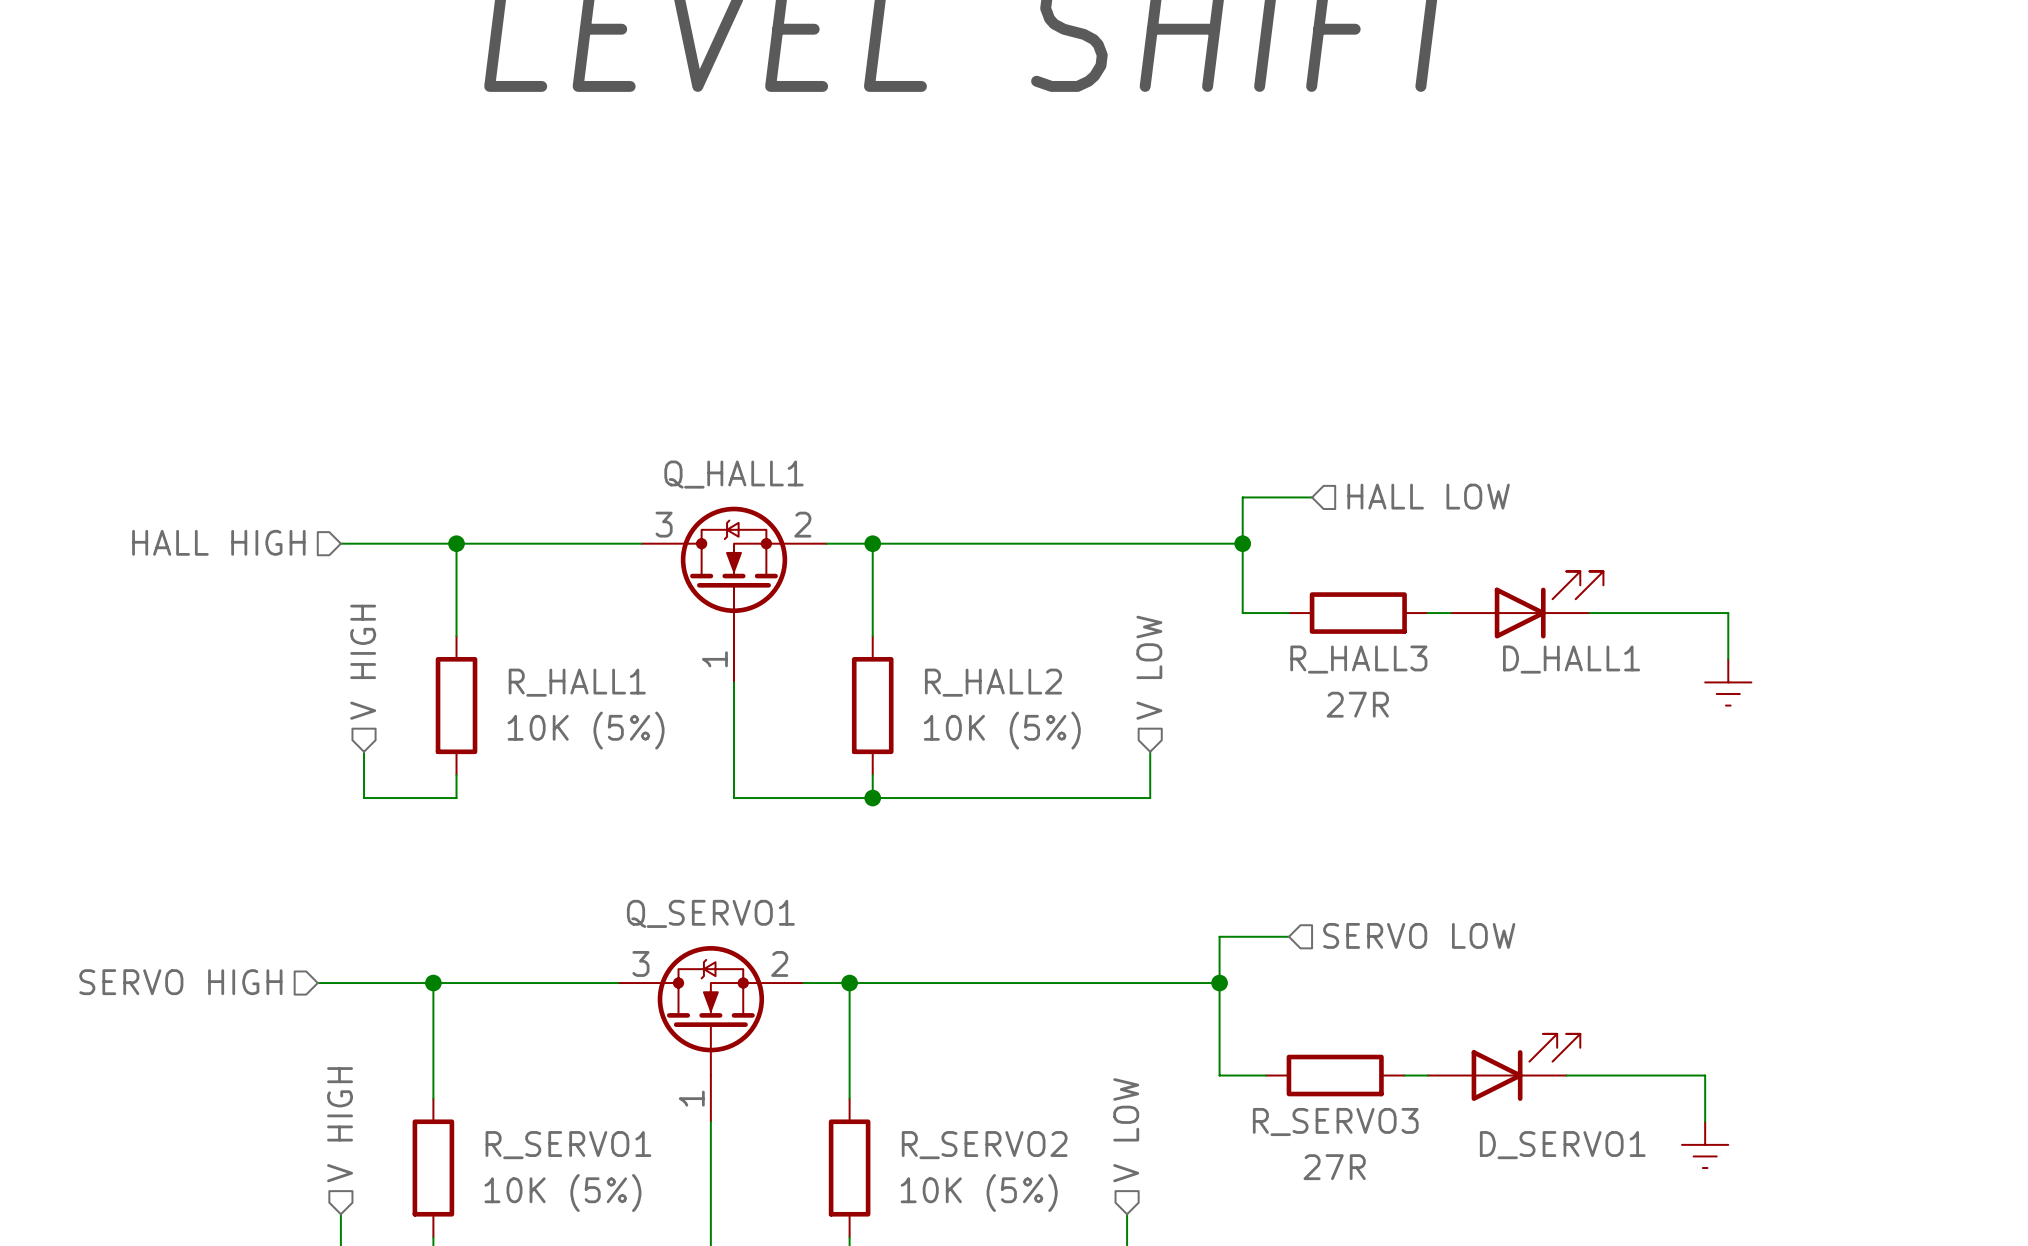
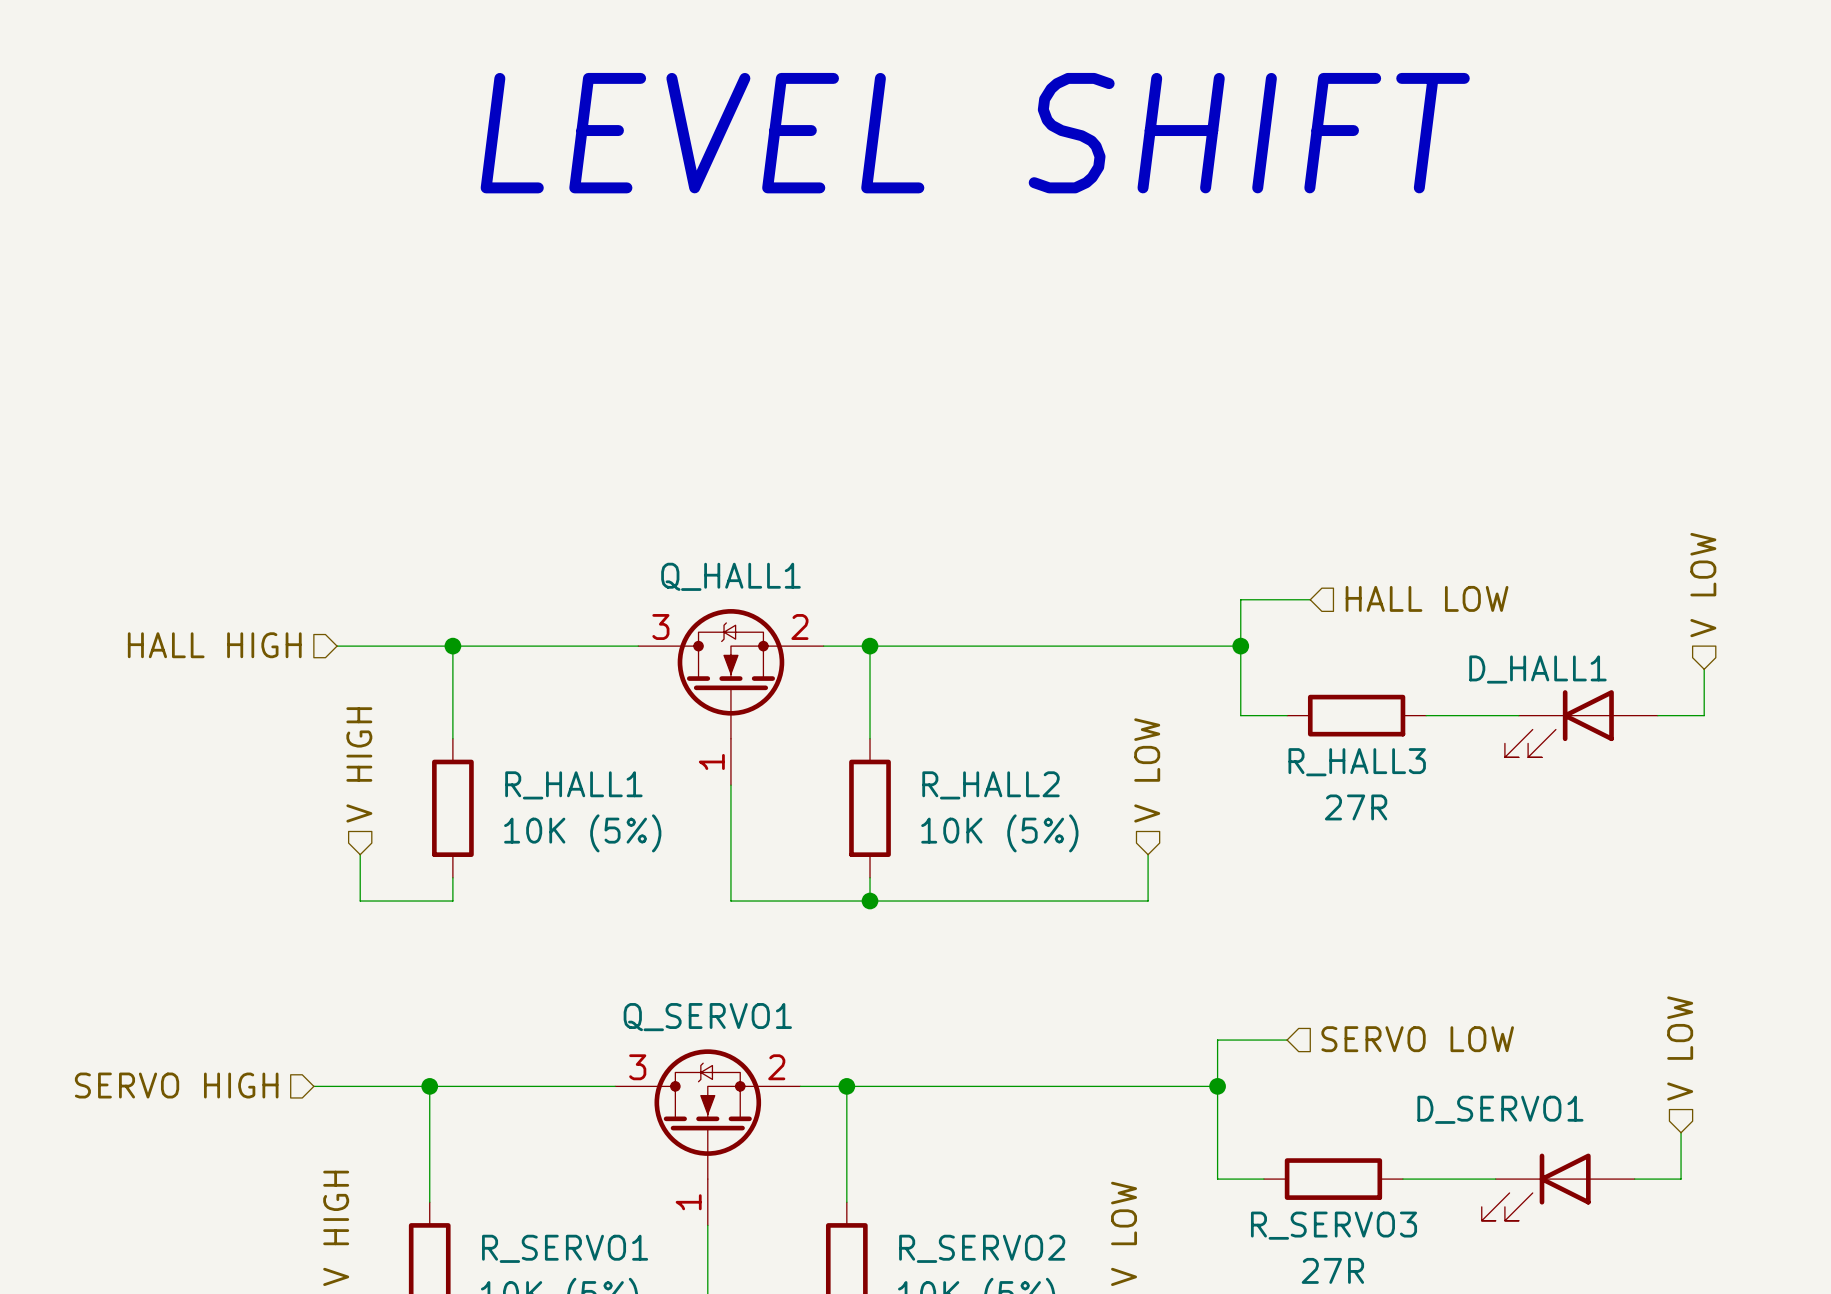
hierarchical label: none -> V LOW (1703, 585)
D_HALL1 rotation: 0° (1549, 604) -> 180° (1559, 723)
wire: (1705, 613) (1728, 613) (1728, 659) -> (1704, 715) (1704, 669)
power symbol: (1728, 682) -> none
hierarchical label: none -> V LOW (1680, 1048)
D_SERVO1 rotation: 0° (1525, 1067) -> 180° (1536, 1187)
wire: (1682, 1075) (1705, 1075) (1705, 1121) -> (1681, 1179) (1681, 1132)
power symbol: (1705, 1144) -> none

